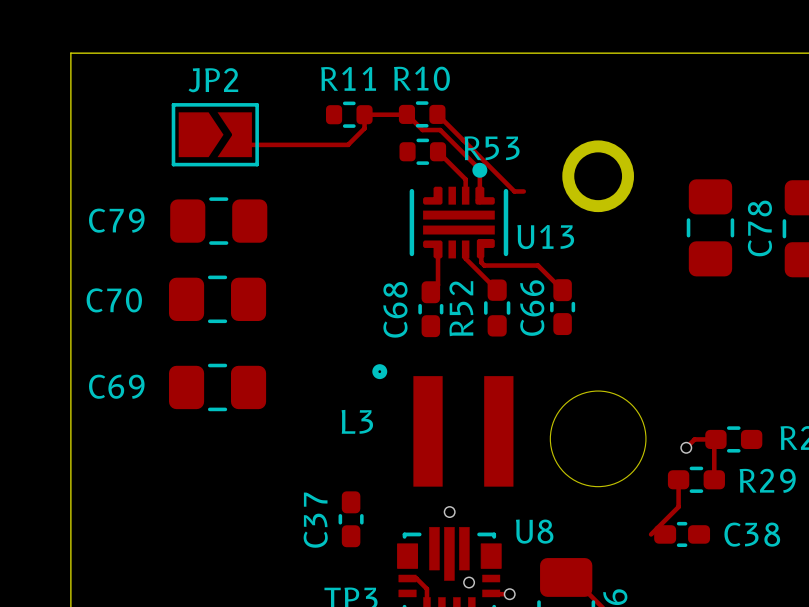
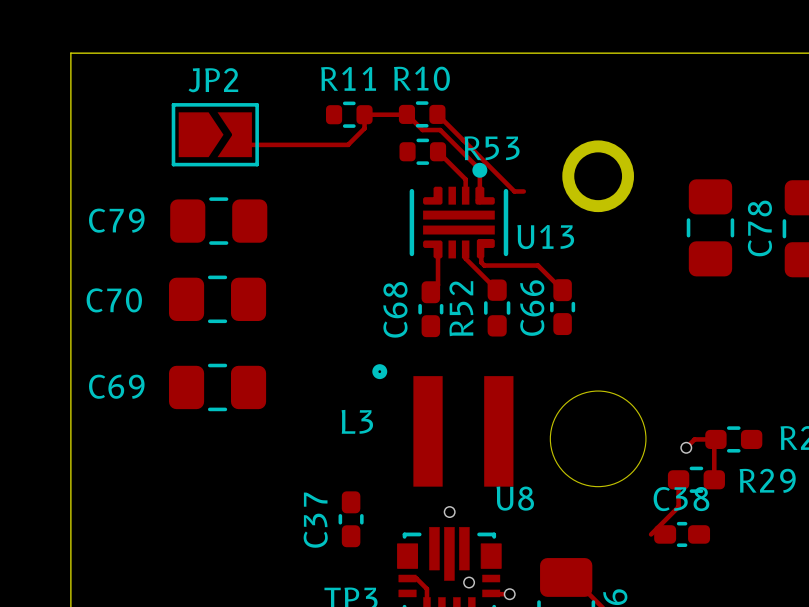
U8 name position: U8 (534, 531) -> U8 (515, 498)
C38 name position: C38 (752, 534) -> C38 (681, 499)

